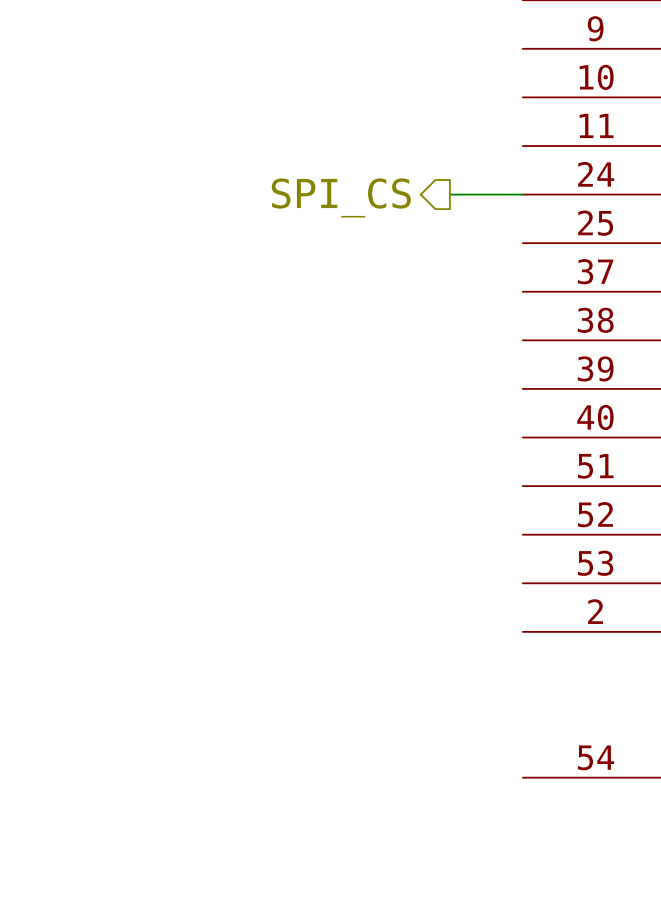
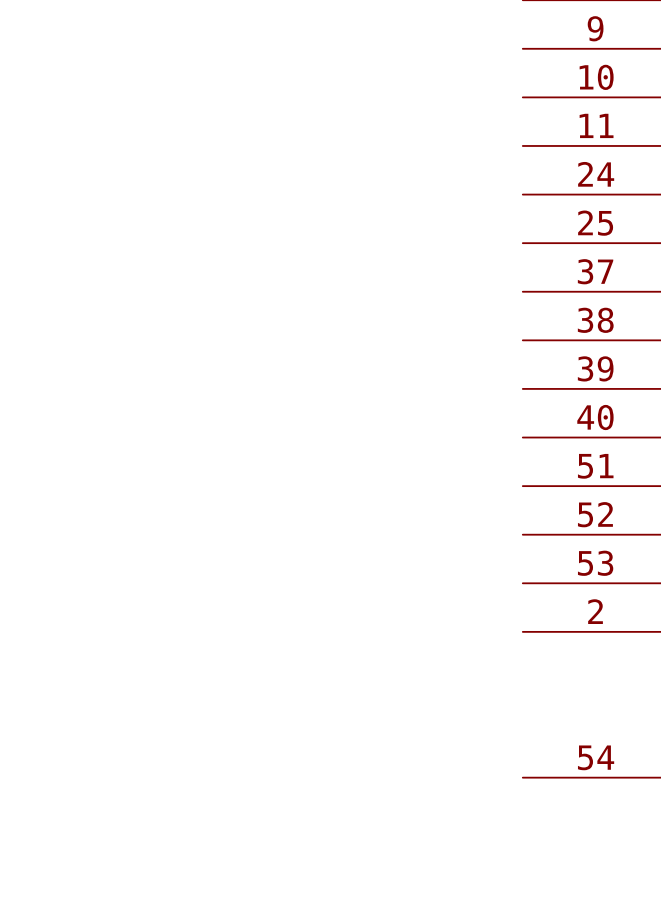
wire: (449, 194) (522, 194) -> none
hierarchical label: SPI_CS (341, 197) -> none

